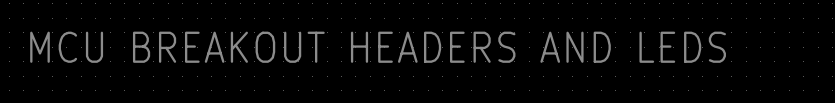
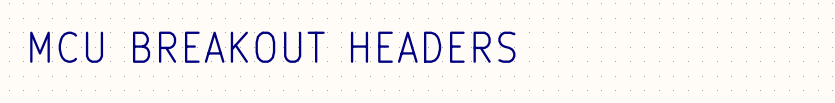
text: MCU BREAKOUT HEADERS AND LEDS (378, 47) -> MCU BREAKOUT HEADERS (272, 47)

